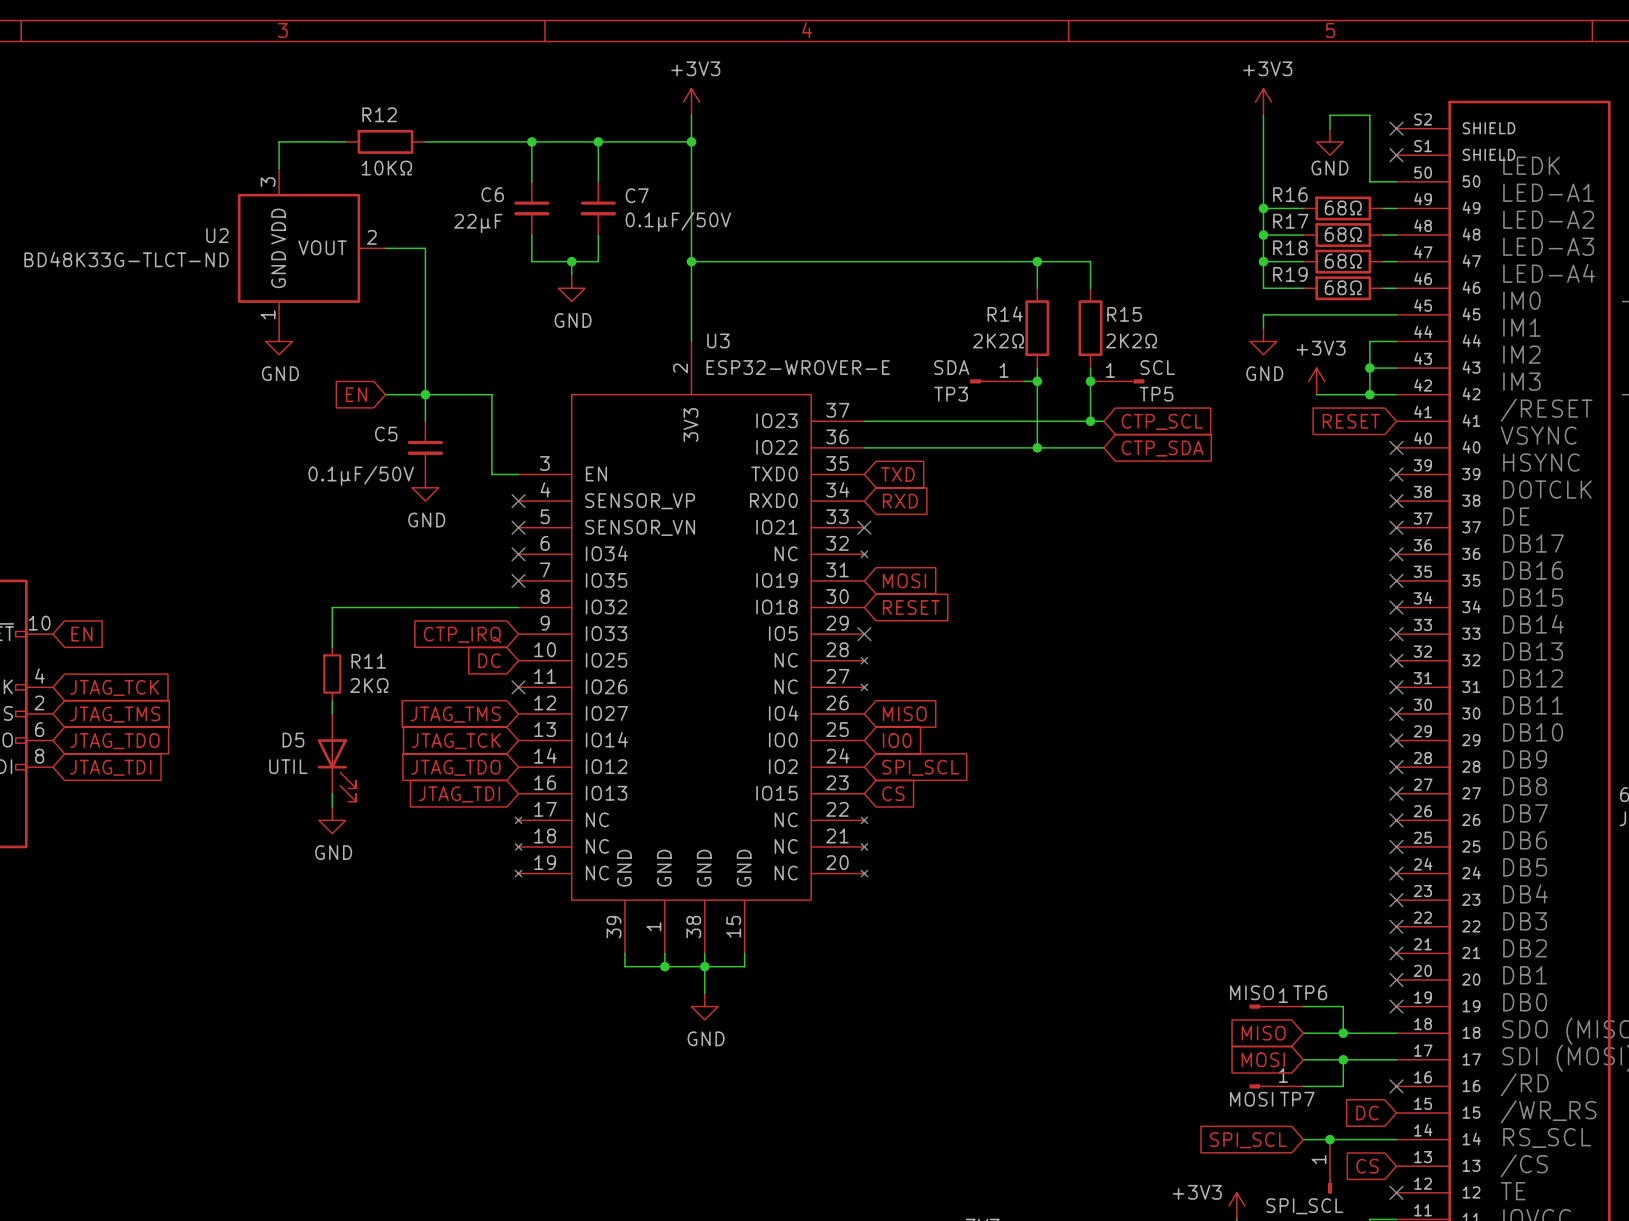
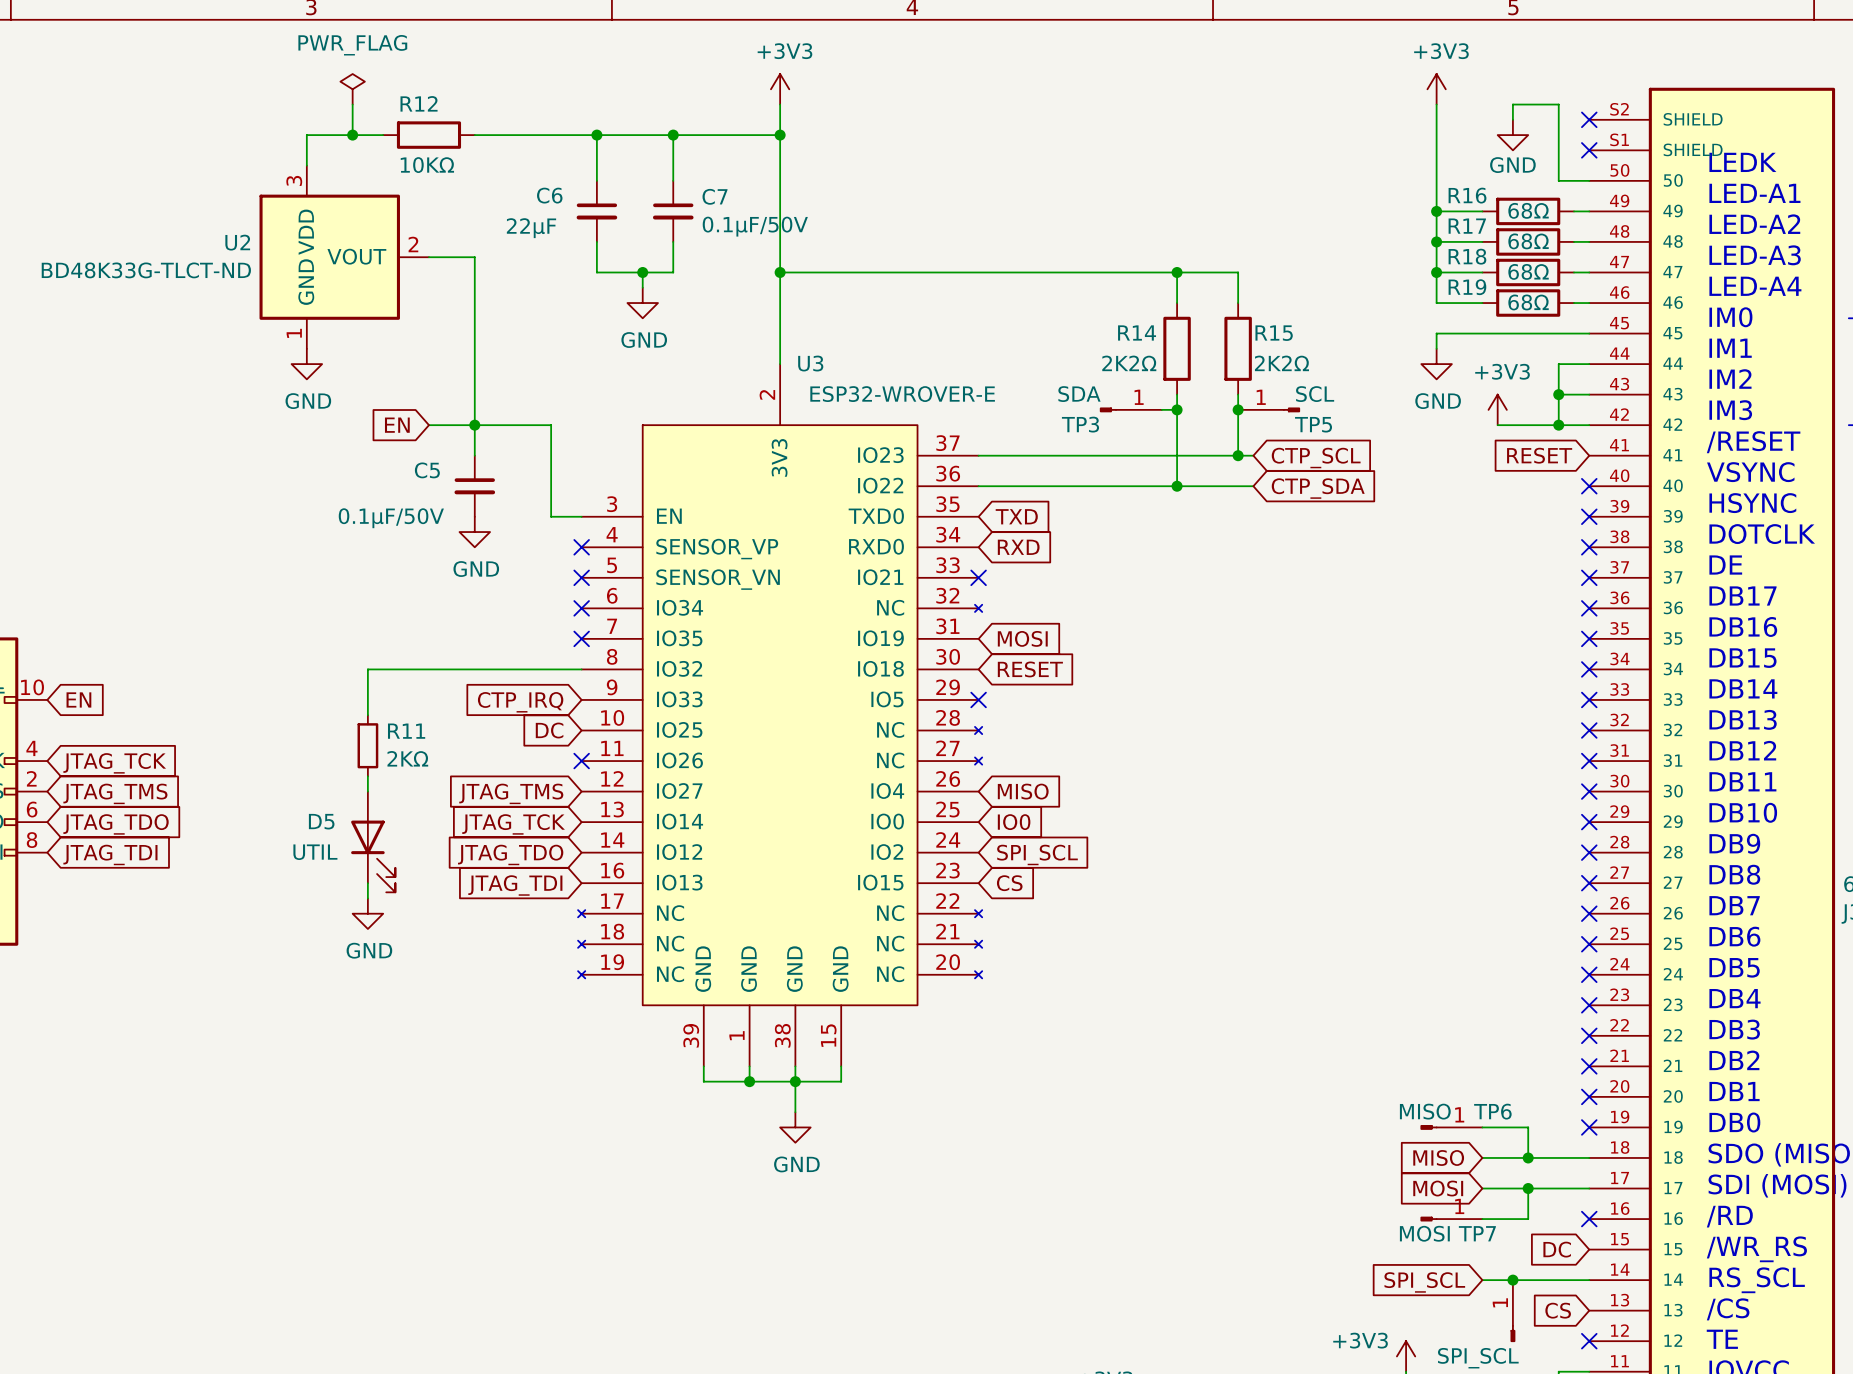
power symbol: none -> PWR_FLAG (352, 89)
wire: none -> (352, 104) (352, 135)
junction: none -> (352, 135)

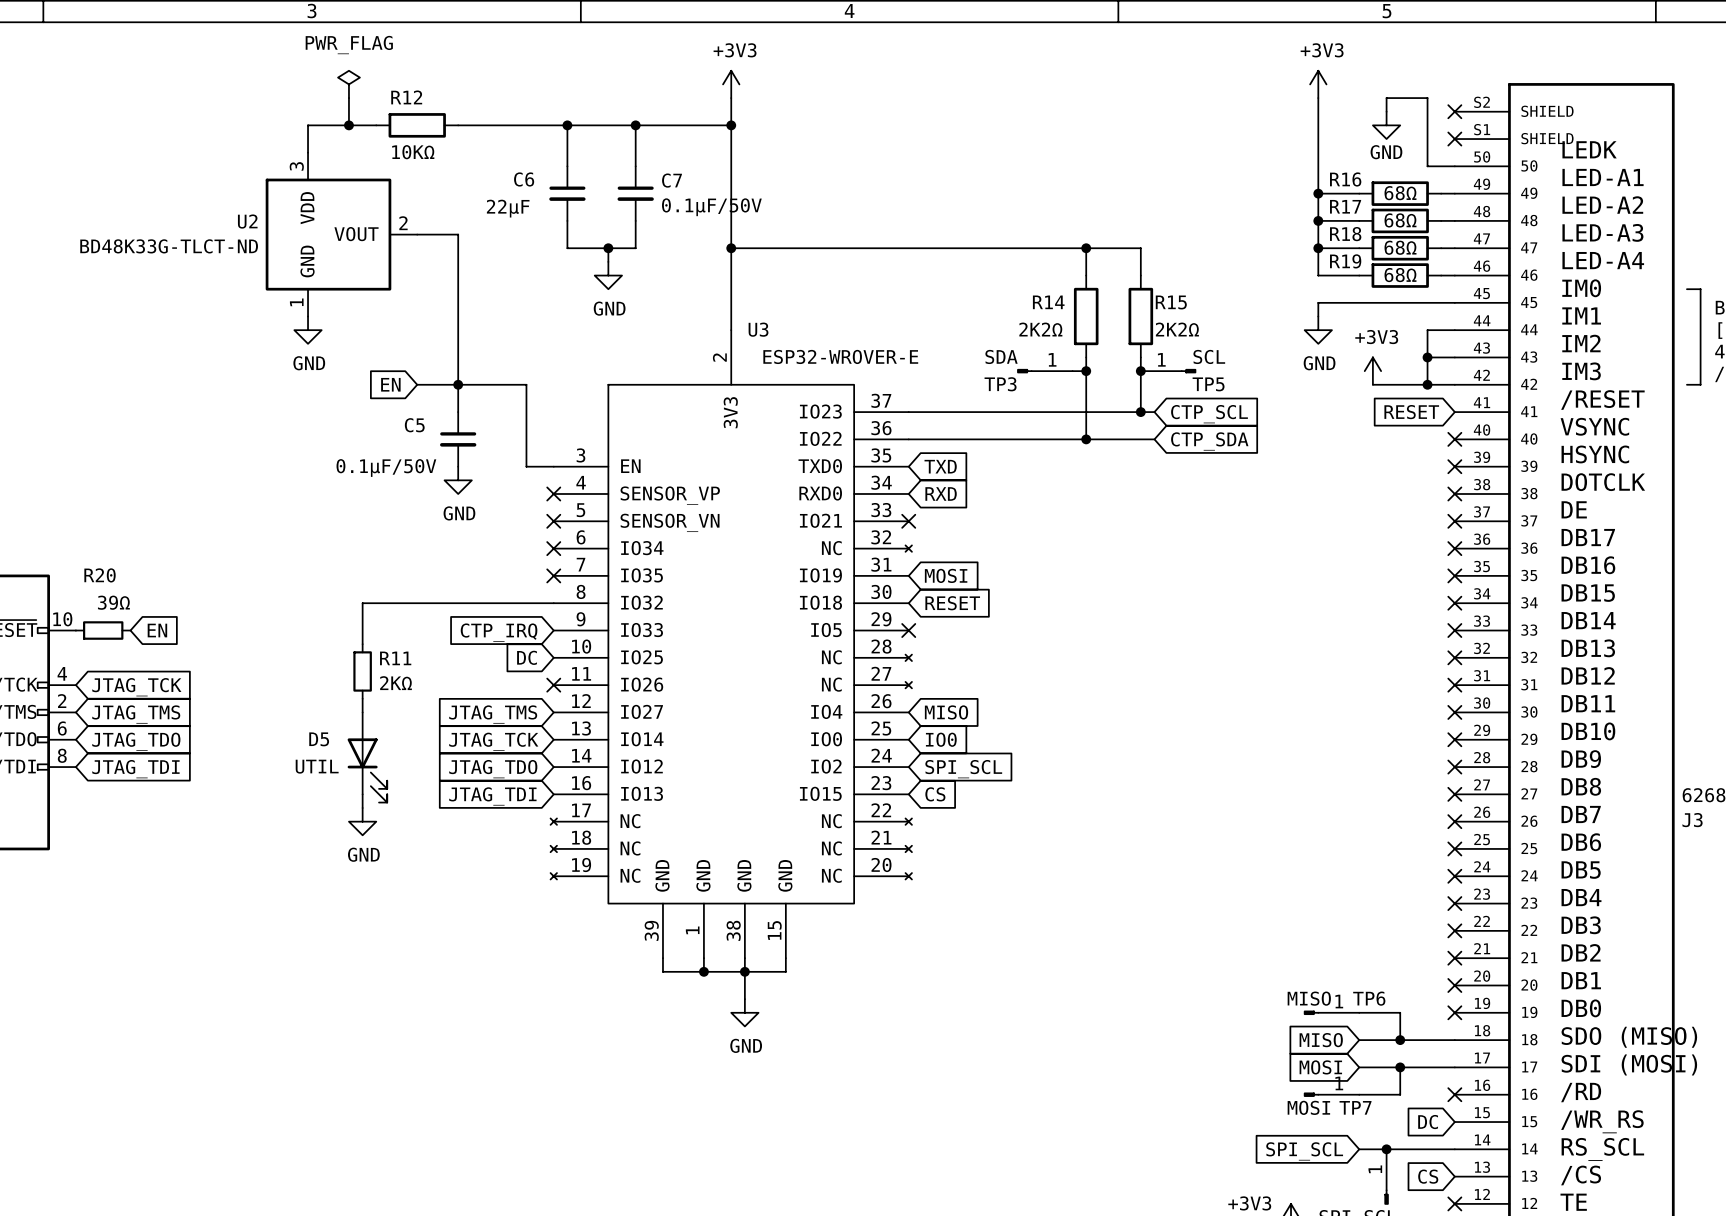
R20: none -> 39Ω (103, 630)
global label position: EN (78, 699) -> EN (157, 630)

